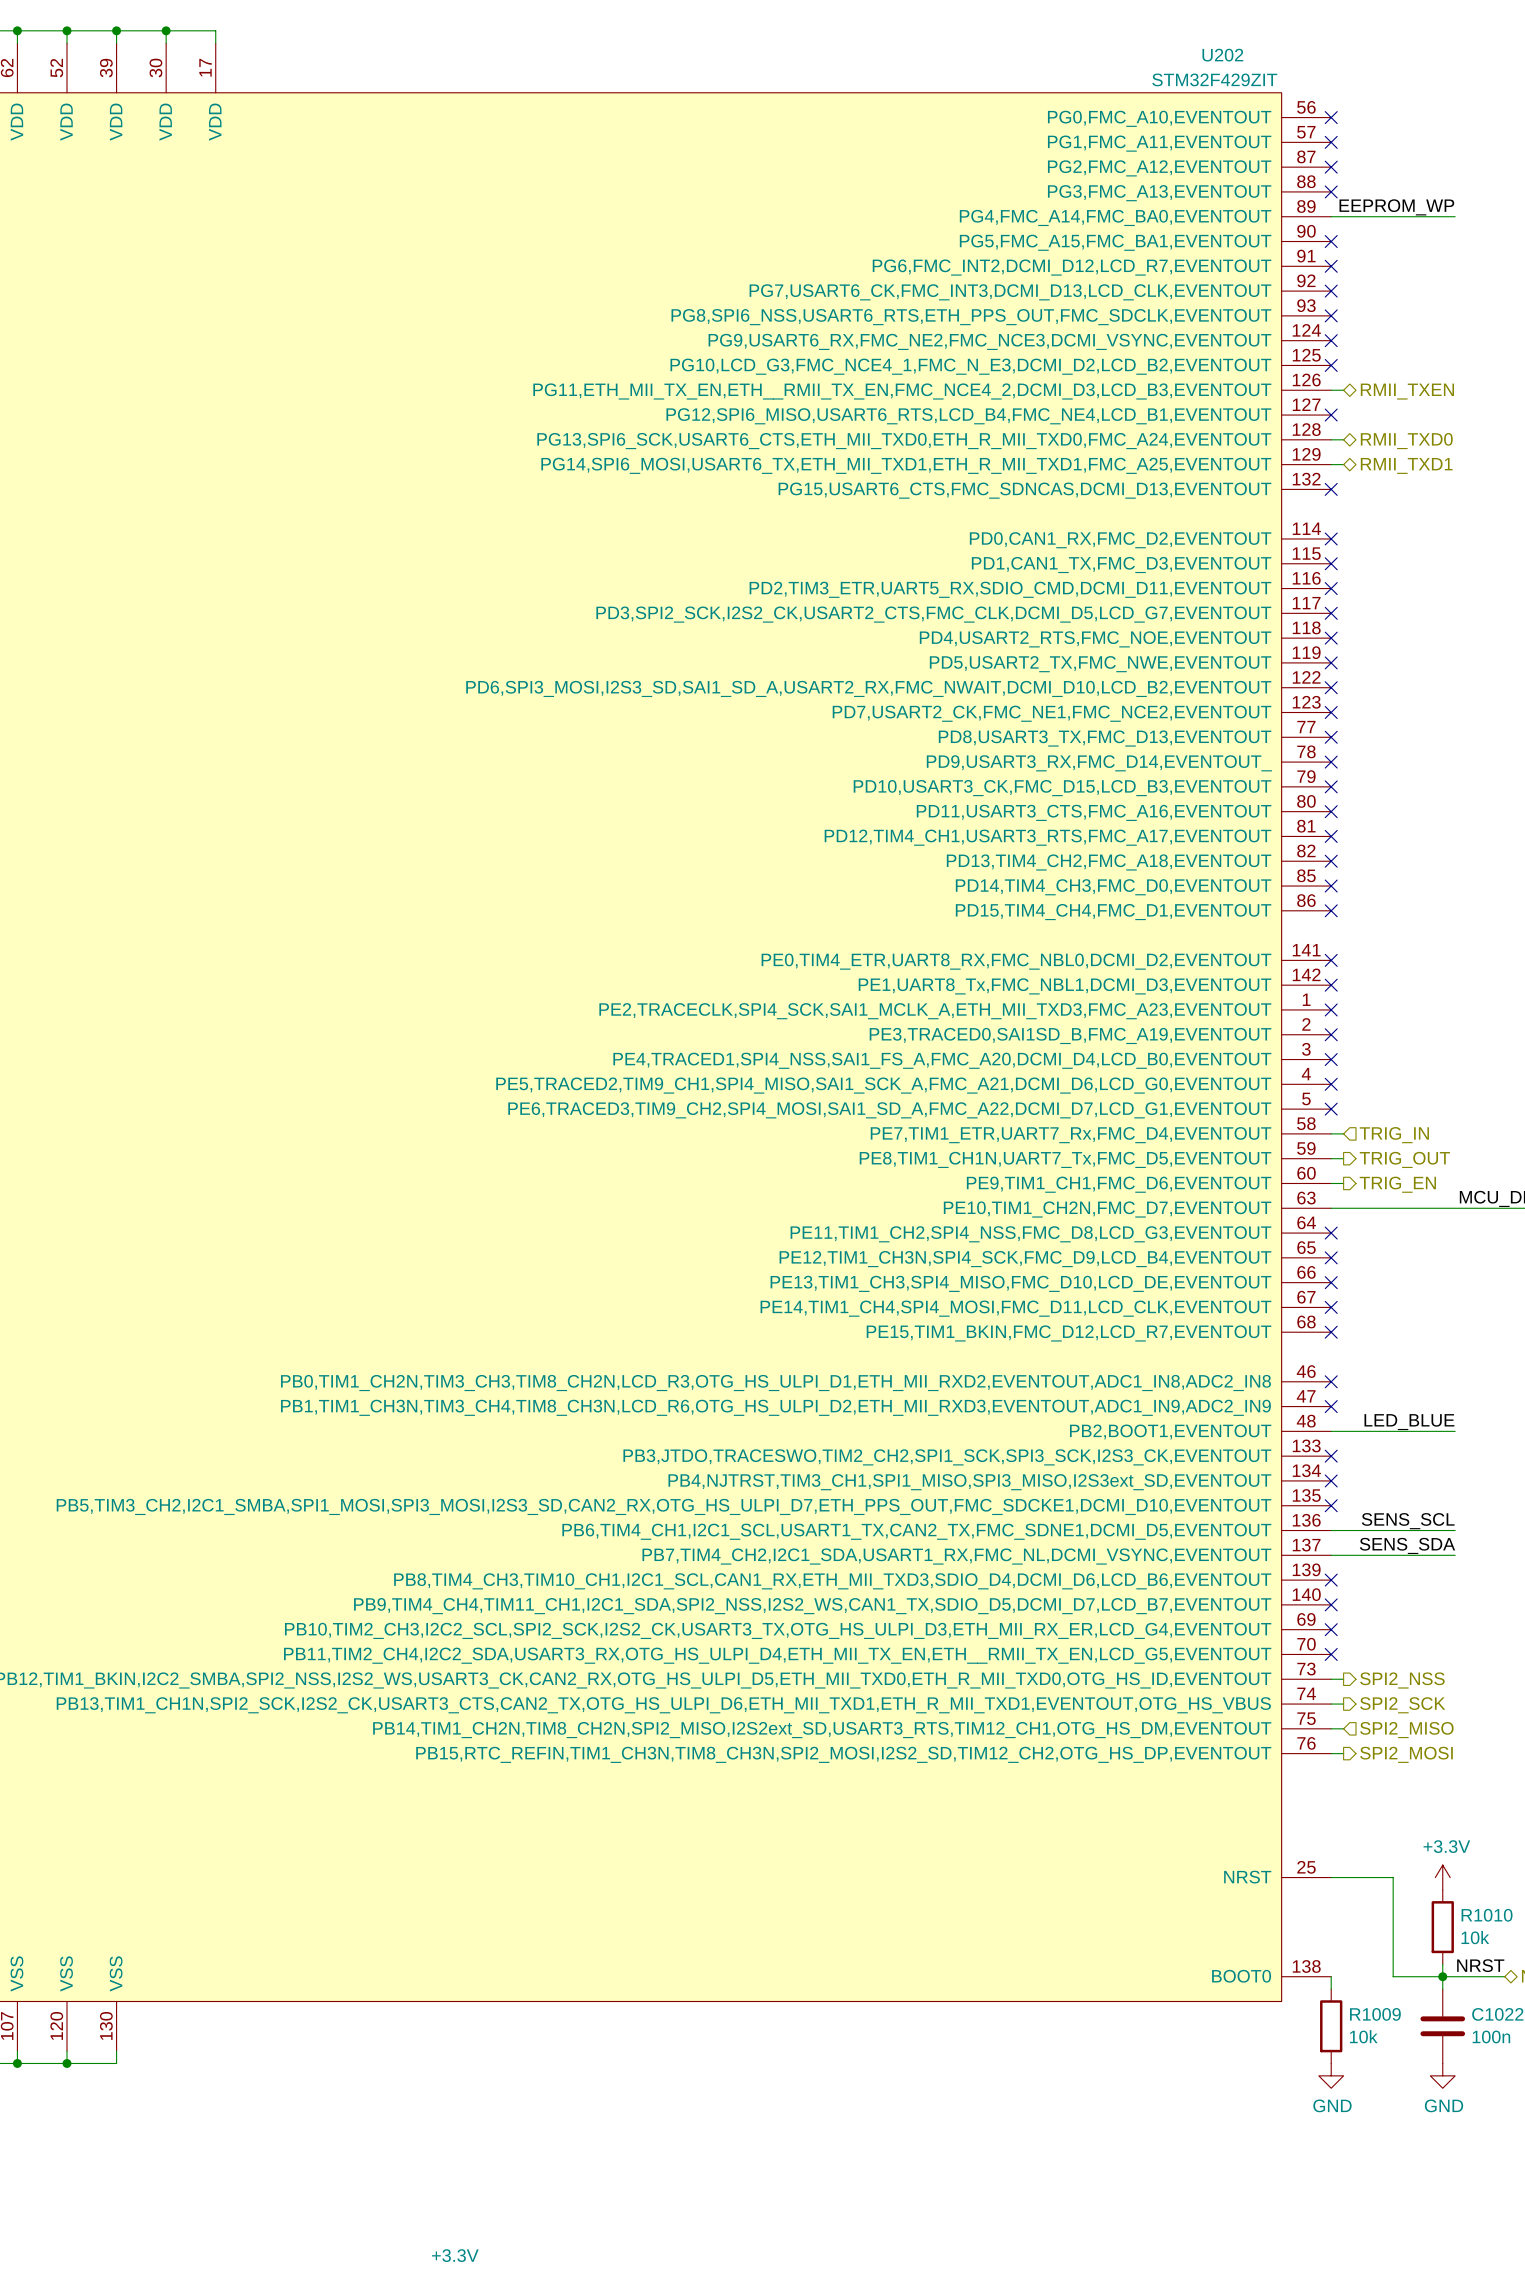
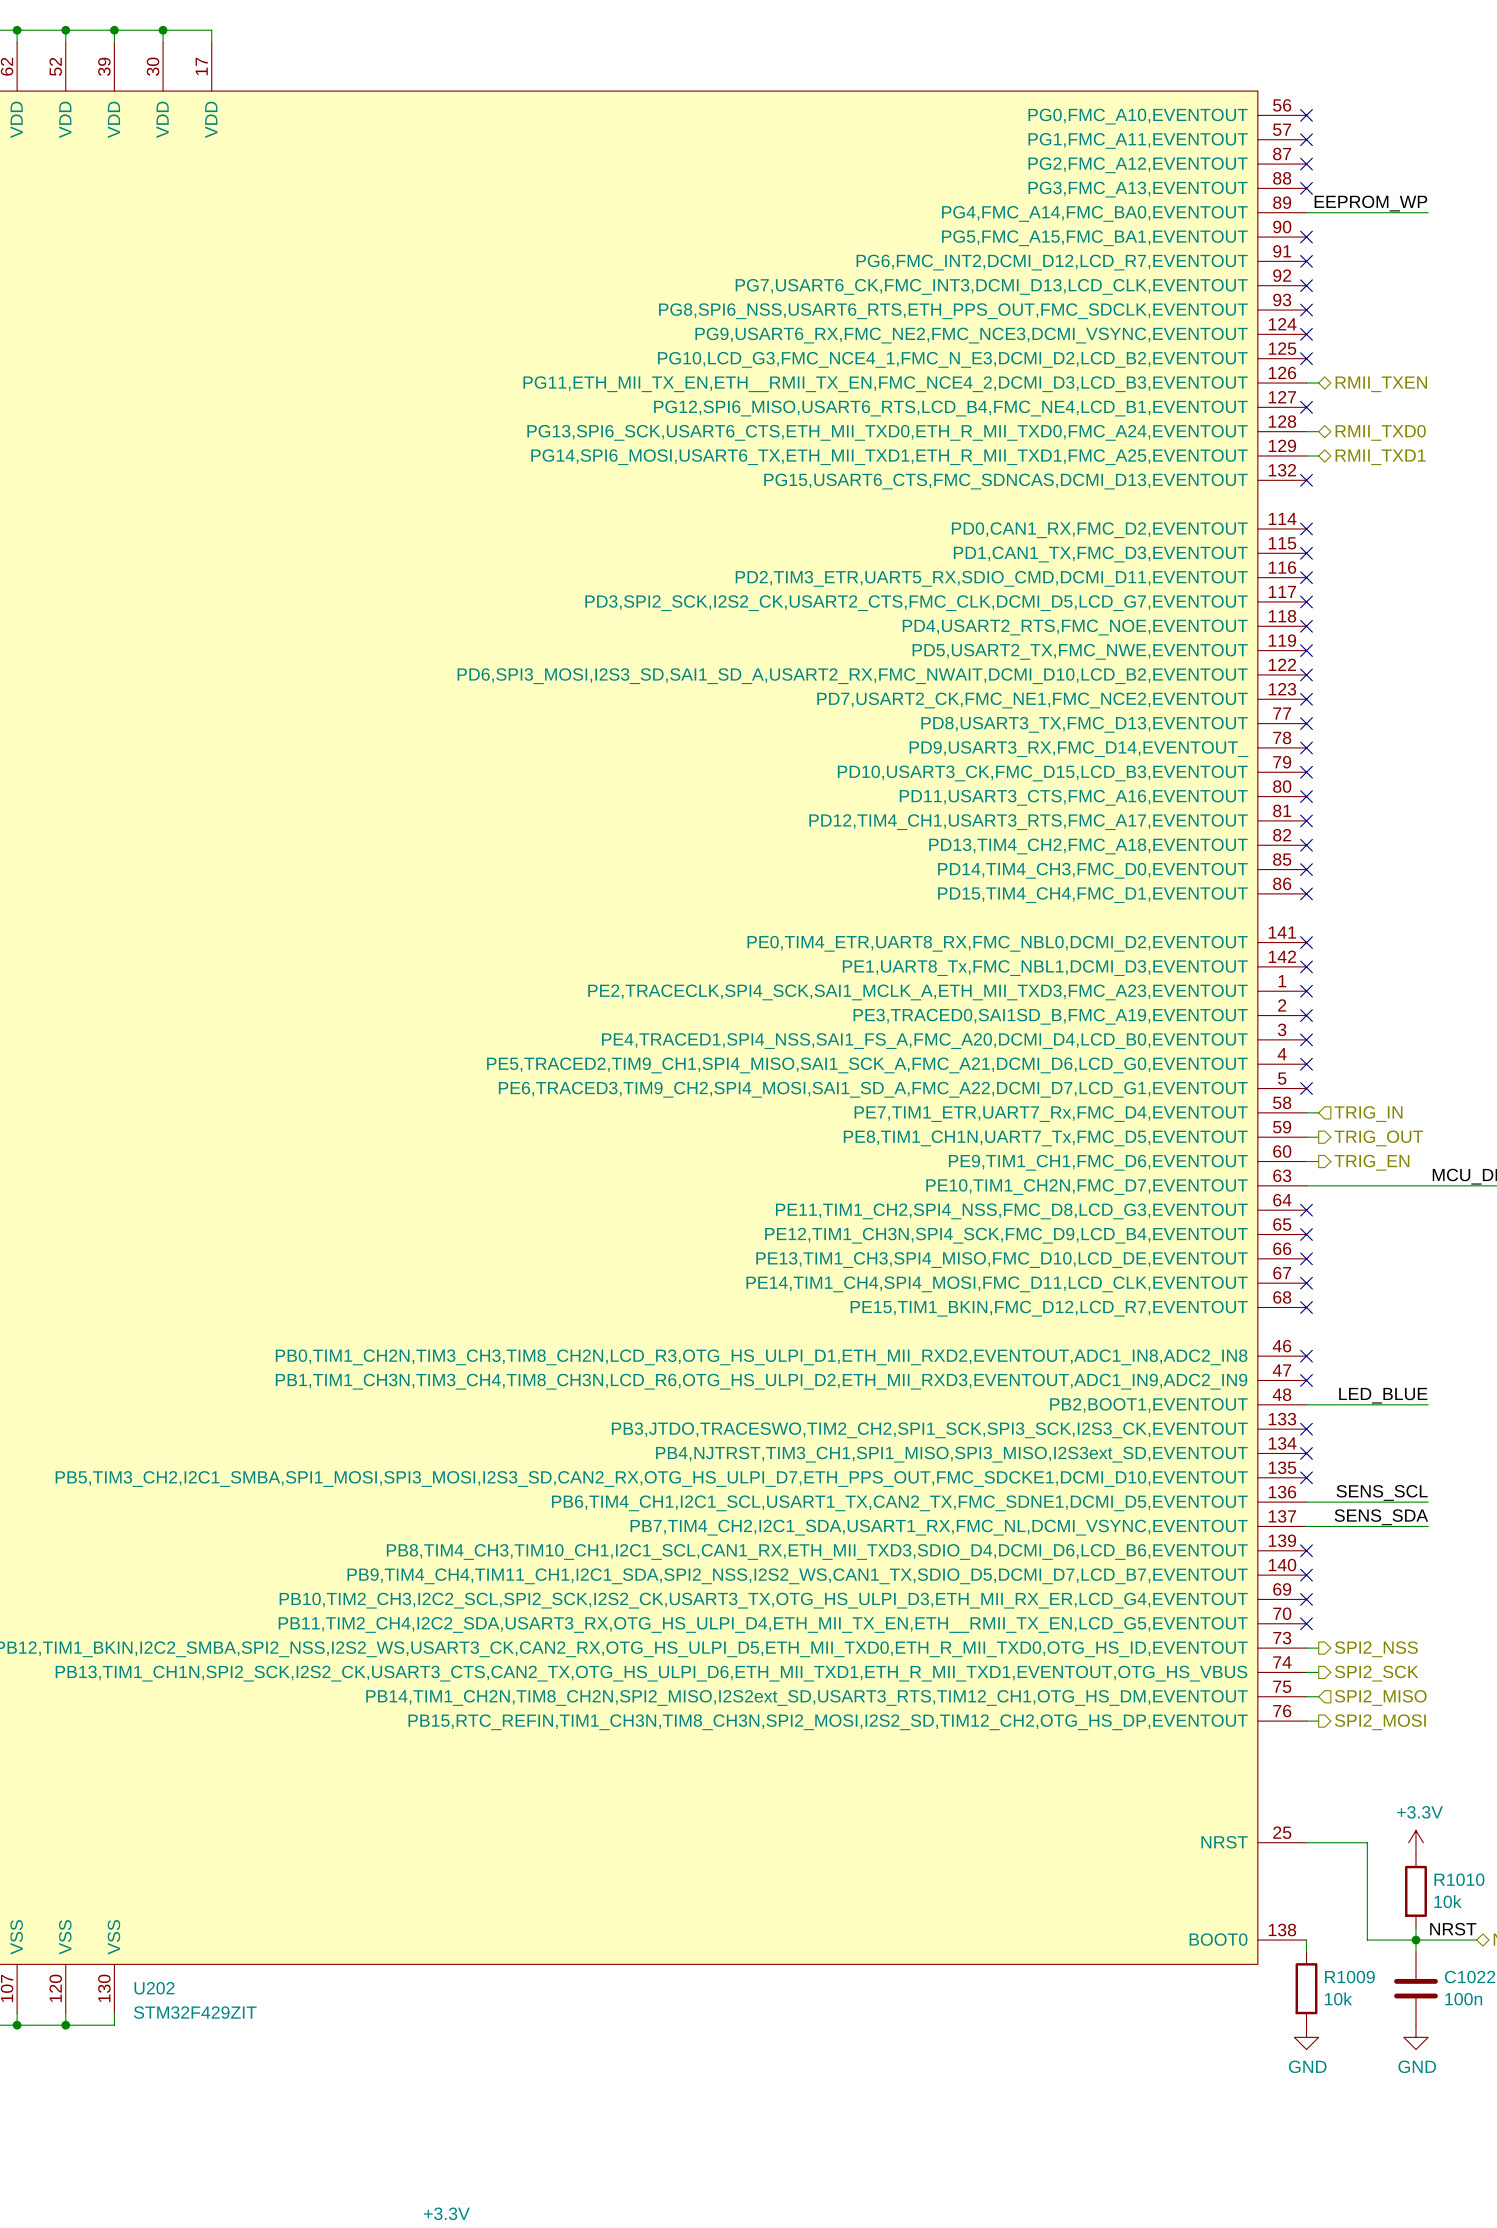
U202 name position: U202 (1222, 55) -> U202 (154, 1988)
U202 value position: STM32F429ZIT (1214, 79) -> STM32F429ZIT (195, 2012)

